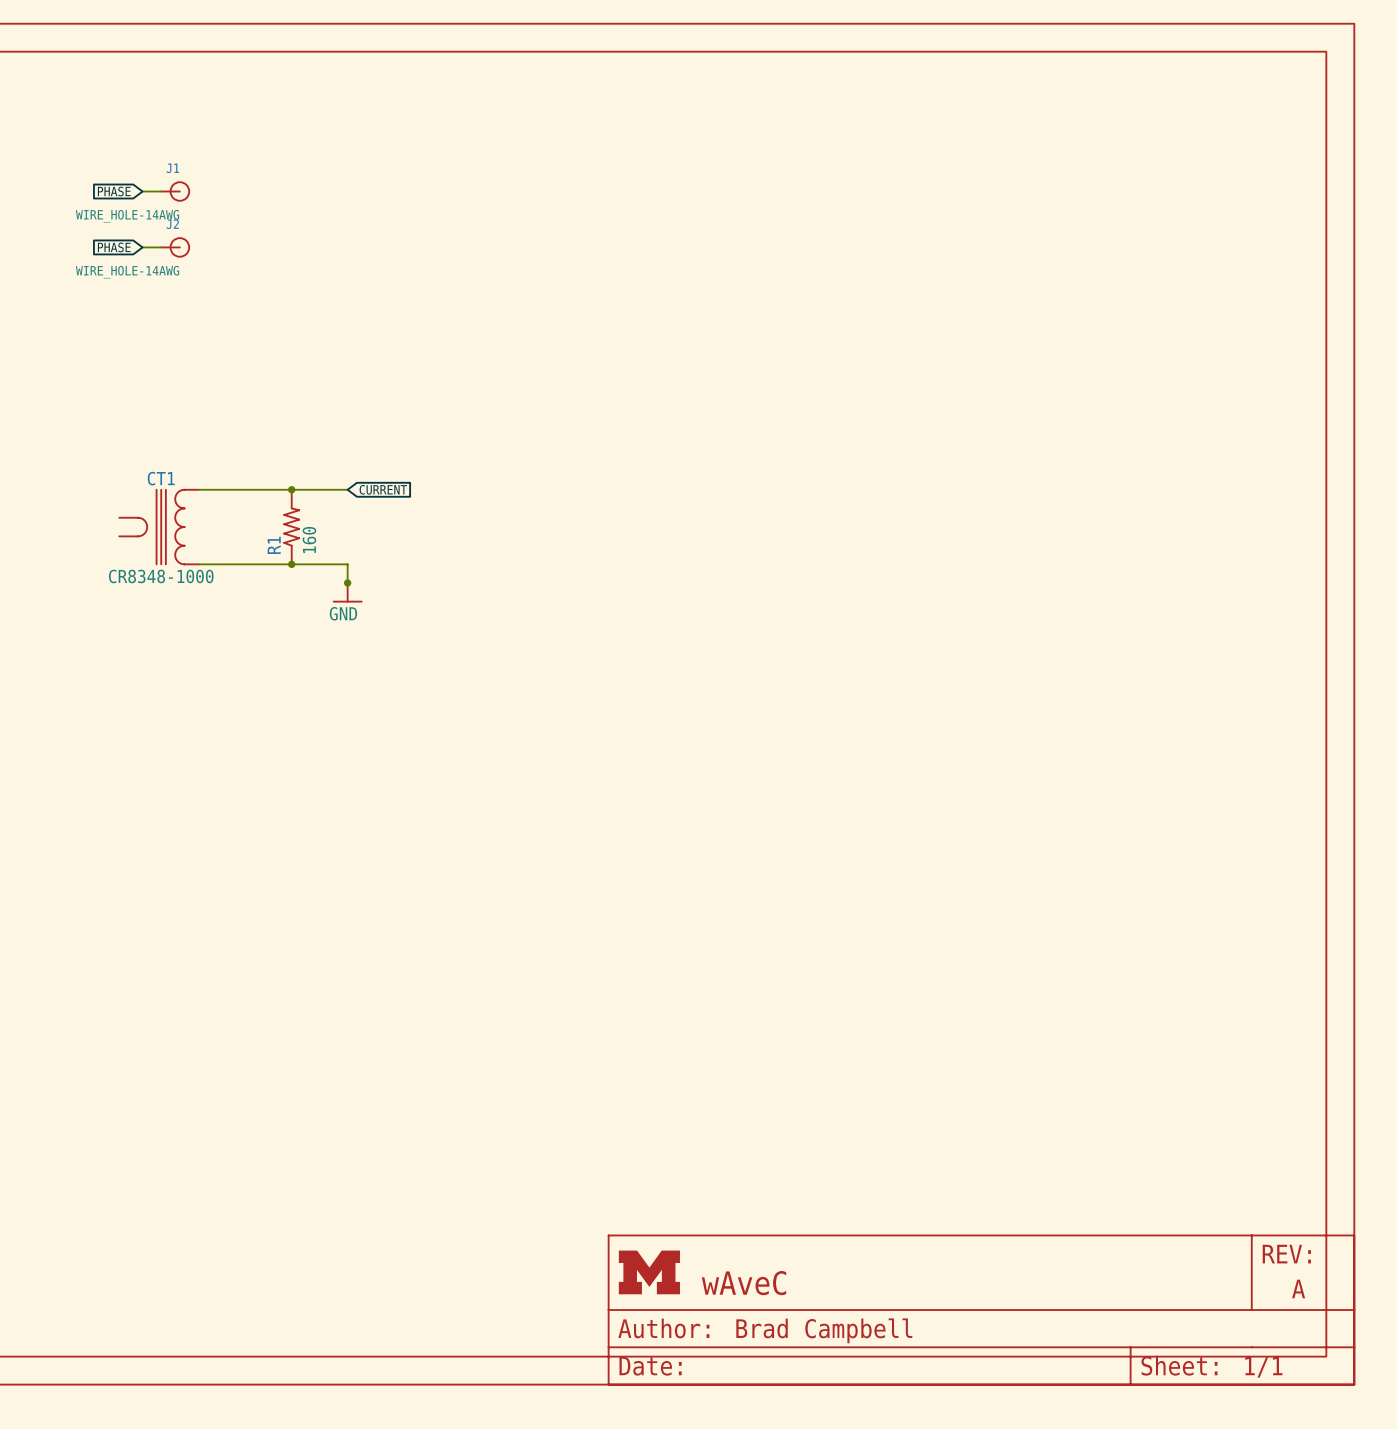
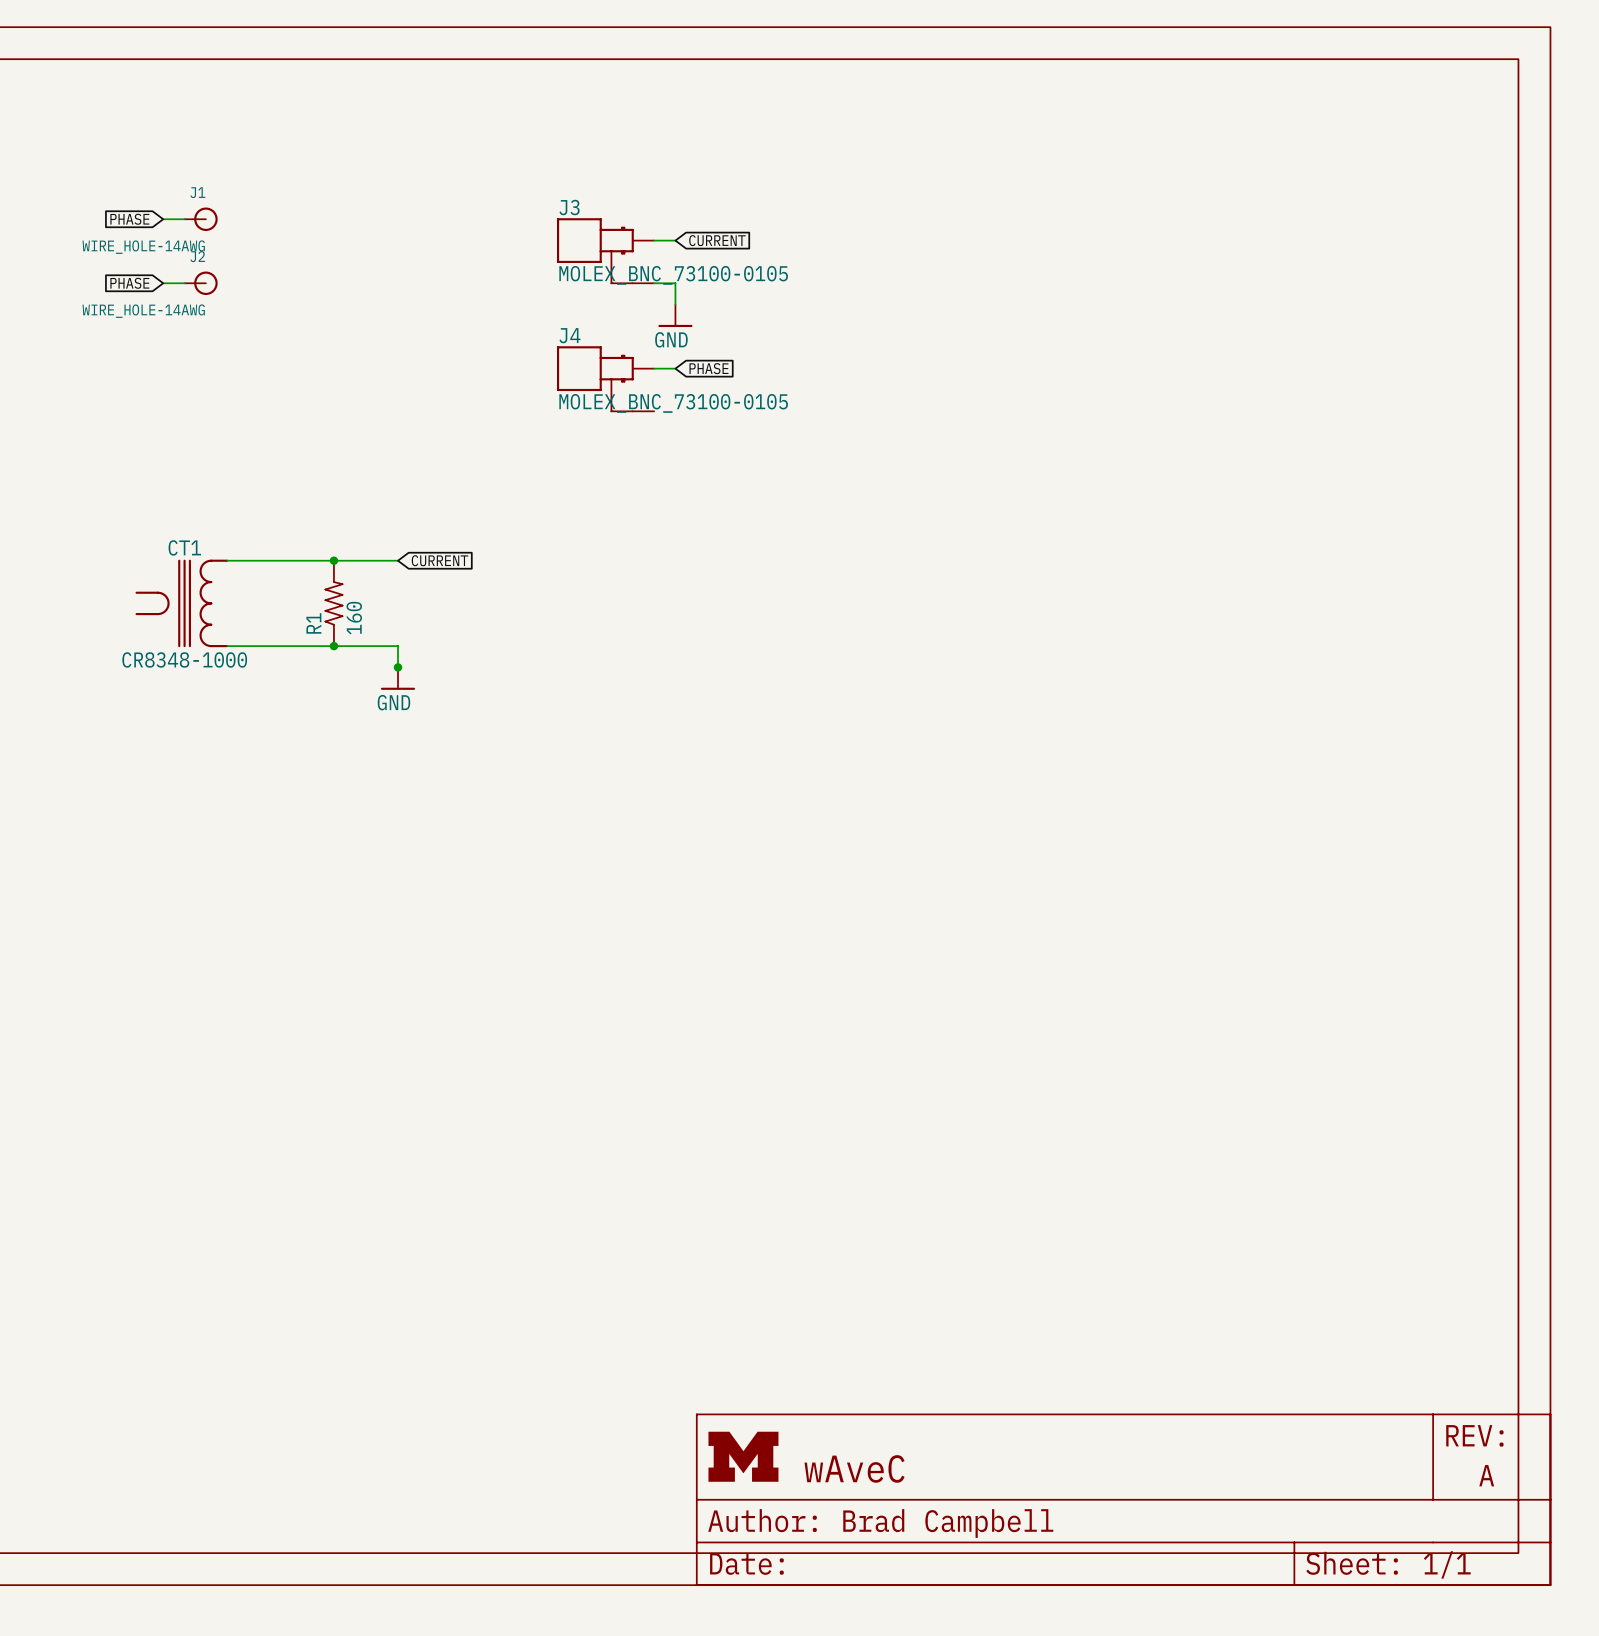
wire: none -> (654, 240) (675, 240)
global label: none -> CURRENT (717, 240)
J3: none -> MOLEX_BNC_73100-0105 (605, 251)
wire: none -> (654, 283) (675, 283) (675, 304)
power symbol: none -> GND (675, 315)
wire: none -> (654, 368) (675, 368)
global label: none -> PHASE (708, 368)
J4: none -> MOLEX_BNC_73100-0105 (605, 379)

